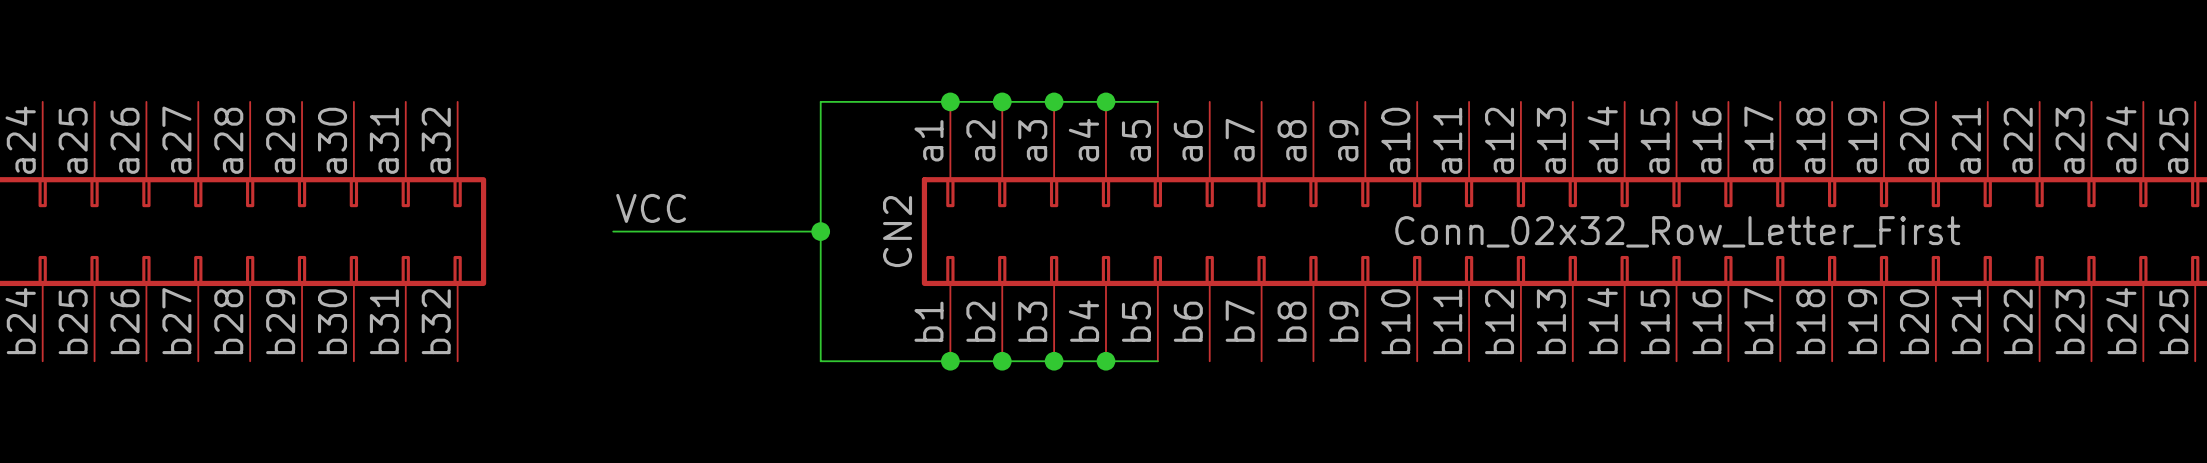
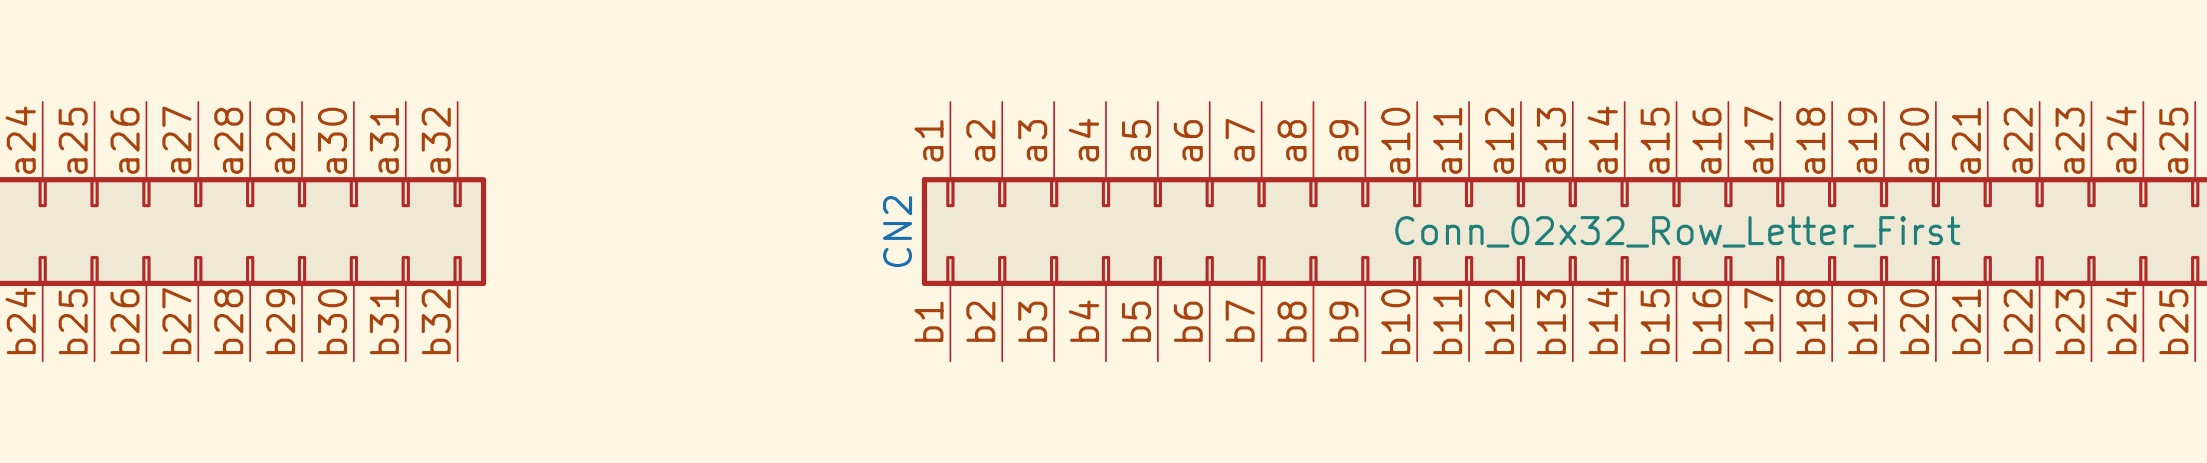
junction: (950, 101) -> none
junction: (1002, 101) -> none
junction: (1054, 101) -> none
junction: (1105, 101) -> none
wire: (1157, 101) (820, 101) (820, 361) (1157, 361) -> none
label: VCC (651, 208) -> none
wire: (613, 231) (820, 231) -> none
junction: (820, 231) -> none
junction: (950, 361) -> none
junction: (1002, 361) -> none
junction: (1054, 361) -> none
junction: (1105, 361) -> none

